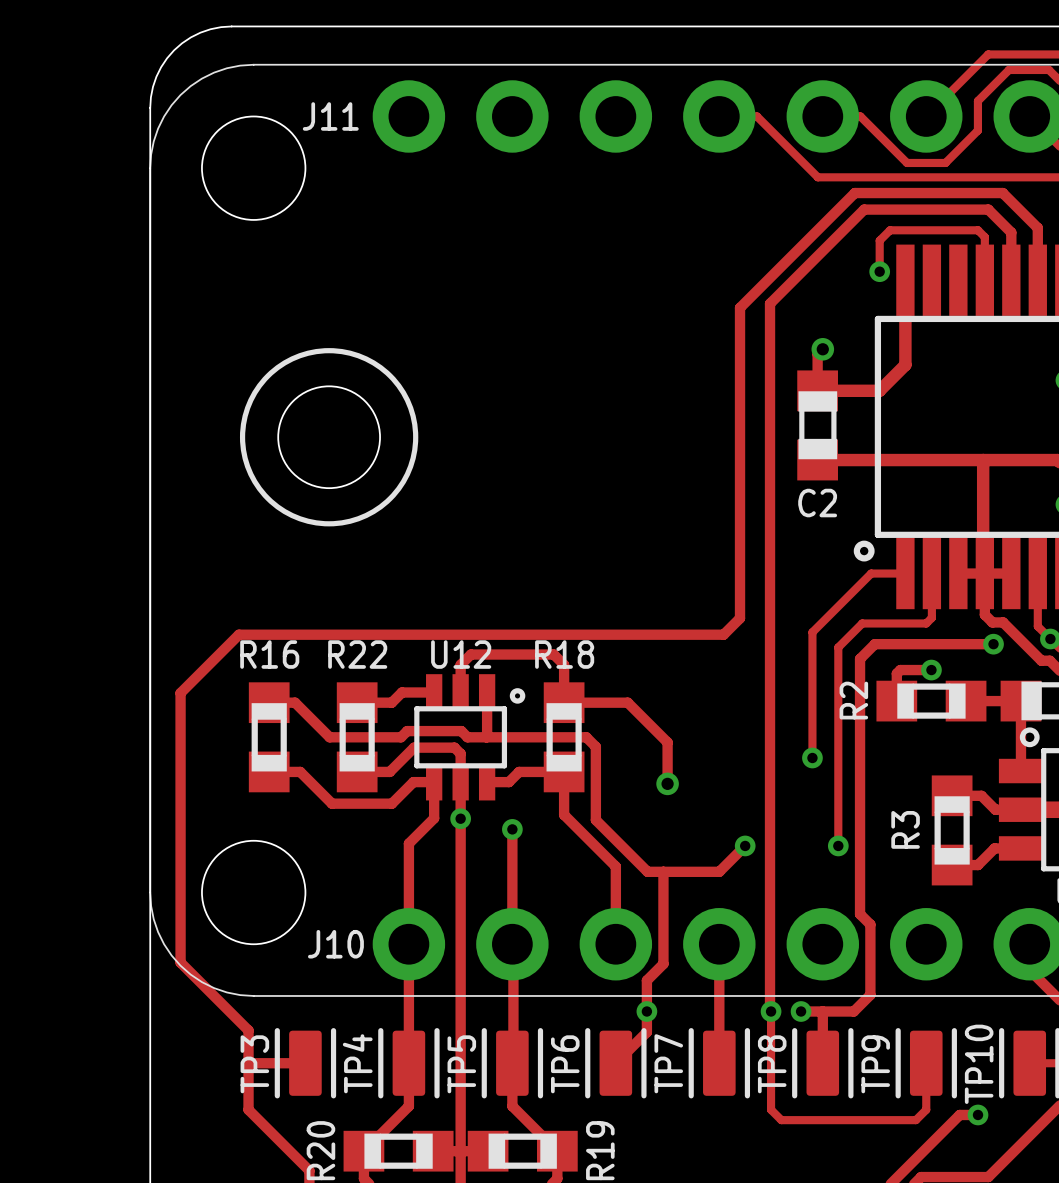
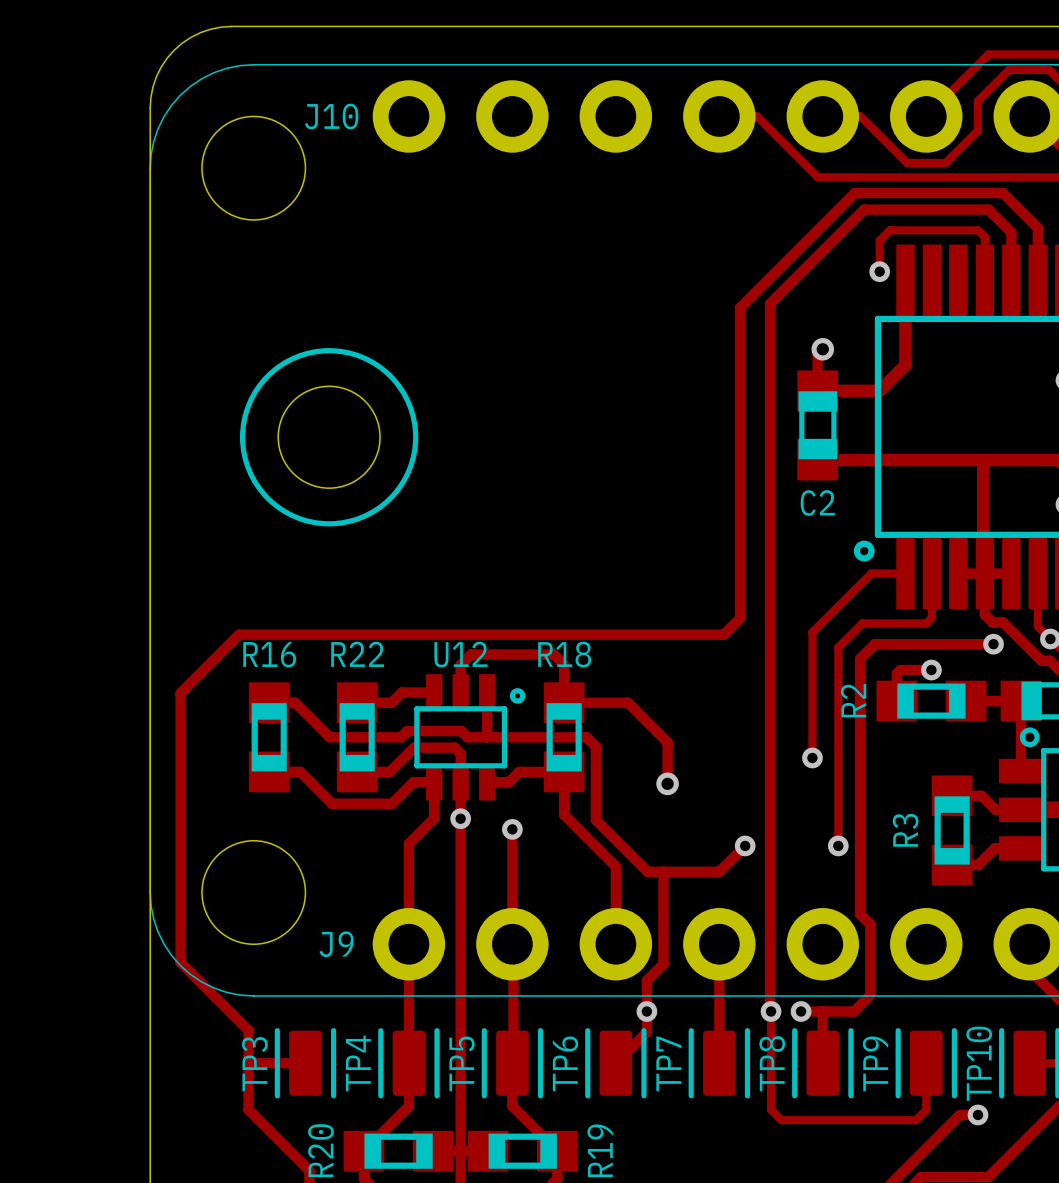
text: J11 (330, 116) -> J10 (331, 116)
text: J10 (335, 944) -> J9 (336, 944)

